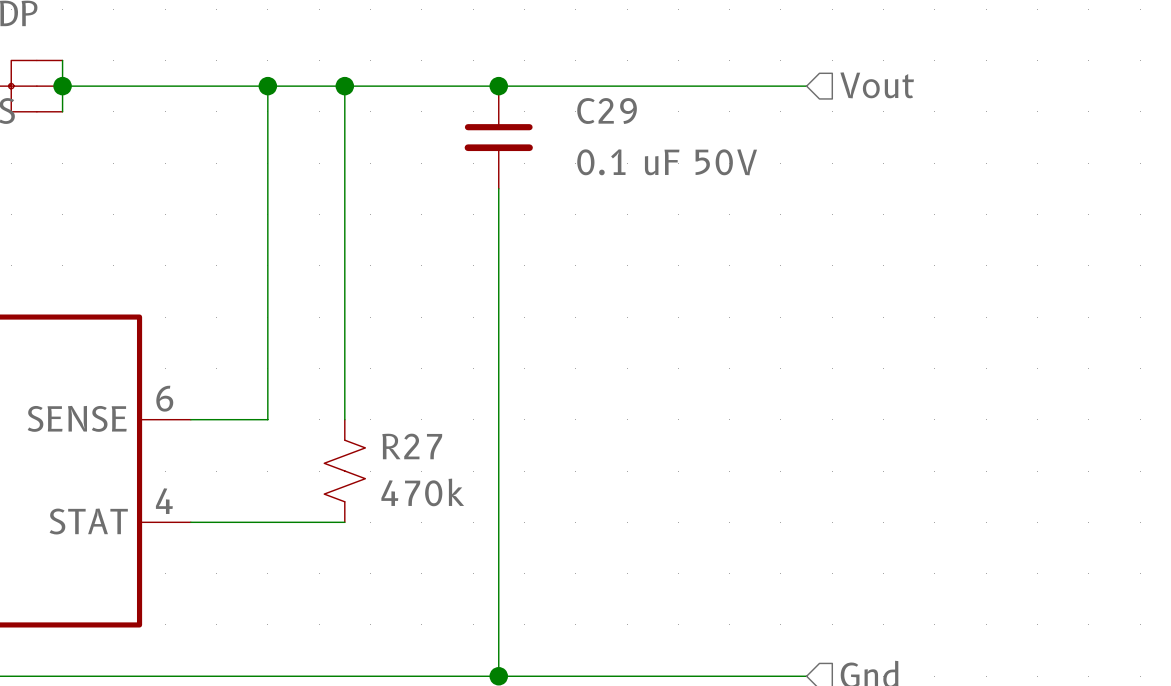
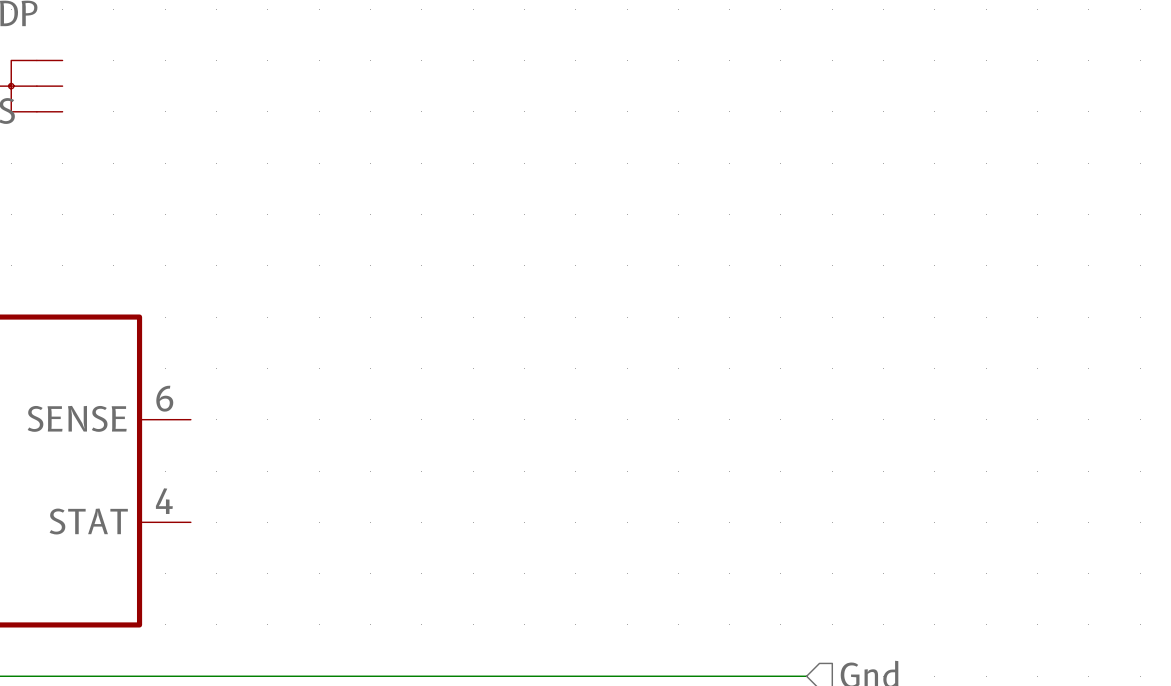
wire: (62, 60) (62, 111) -> none
hierarchical label: Vout (877, 85) -> none
wire: (62, 86) (806, 86) -> none
junction: (62, 86) -> none
wire: (267, 86) (267, 419) (190, 419) -> none
junction: (267, 86) -> none
wire: (344, 86) (344, 419) -> none
junction: (344, 86) -> none
junction: (498, 86) -> none
C29: 0.1 uF 50V (498, 137) -> none
wire: (498, 188) (498, 676) -> none
R27: 470k (344, 471) -> none
wire: (190, 522) (344, 522) -> none
junction: (498, 676) -> none

